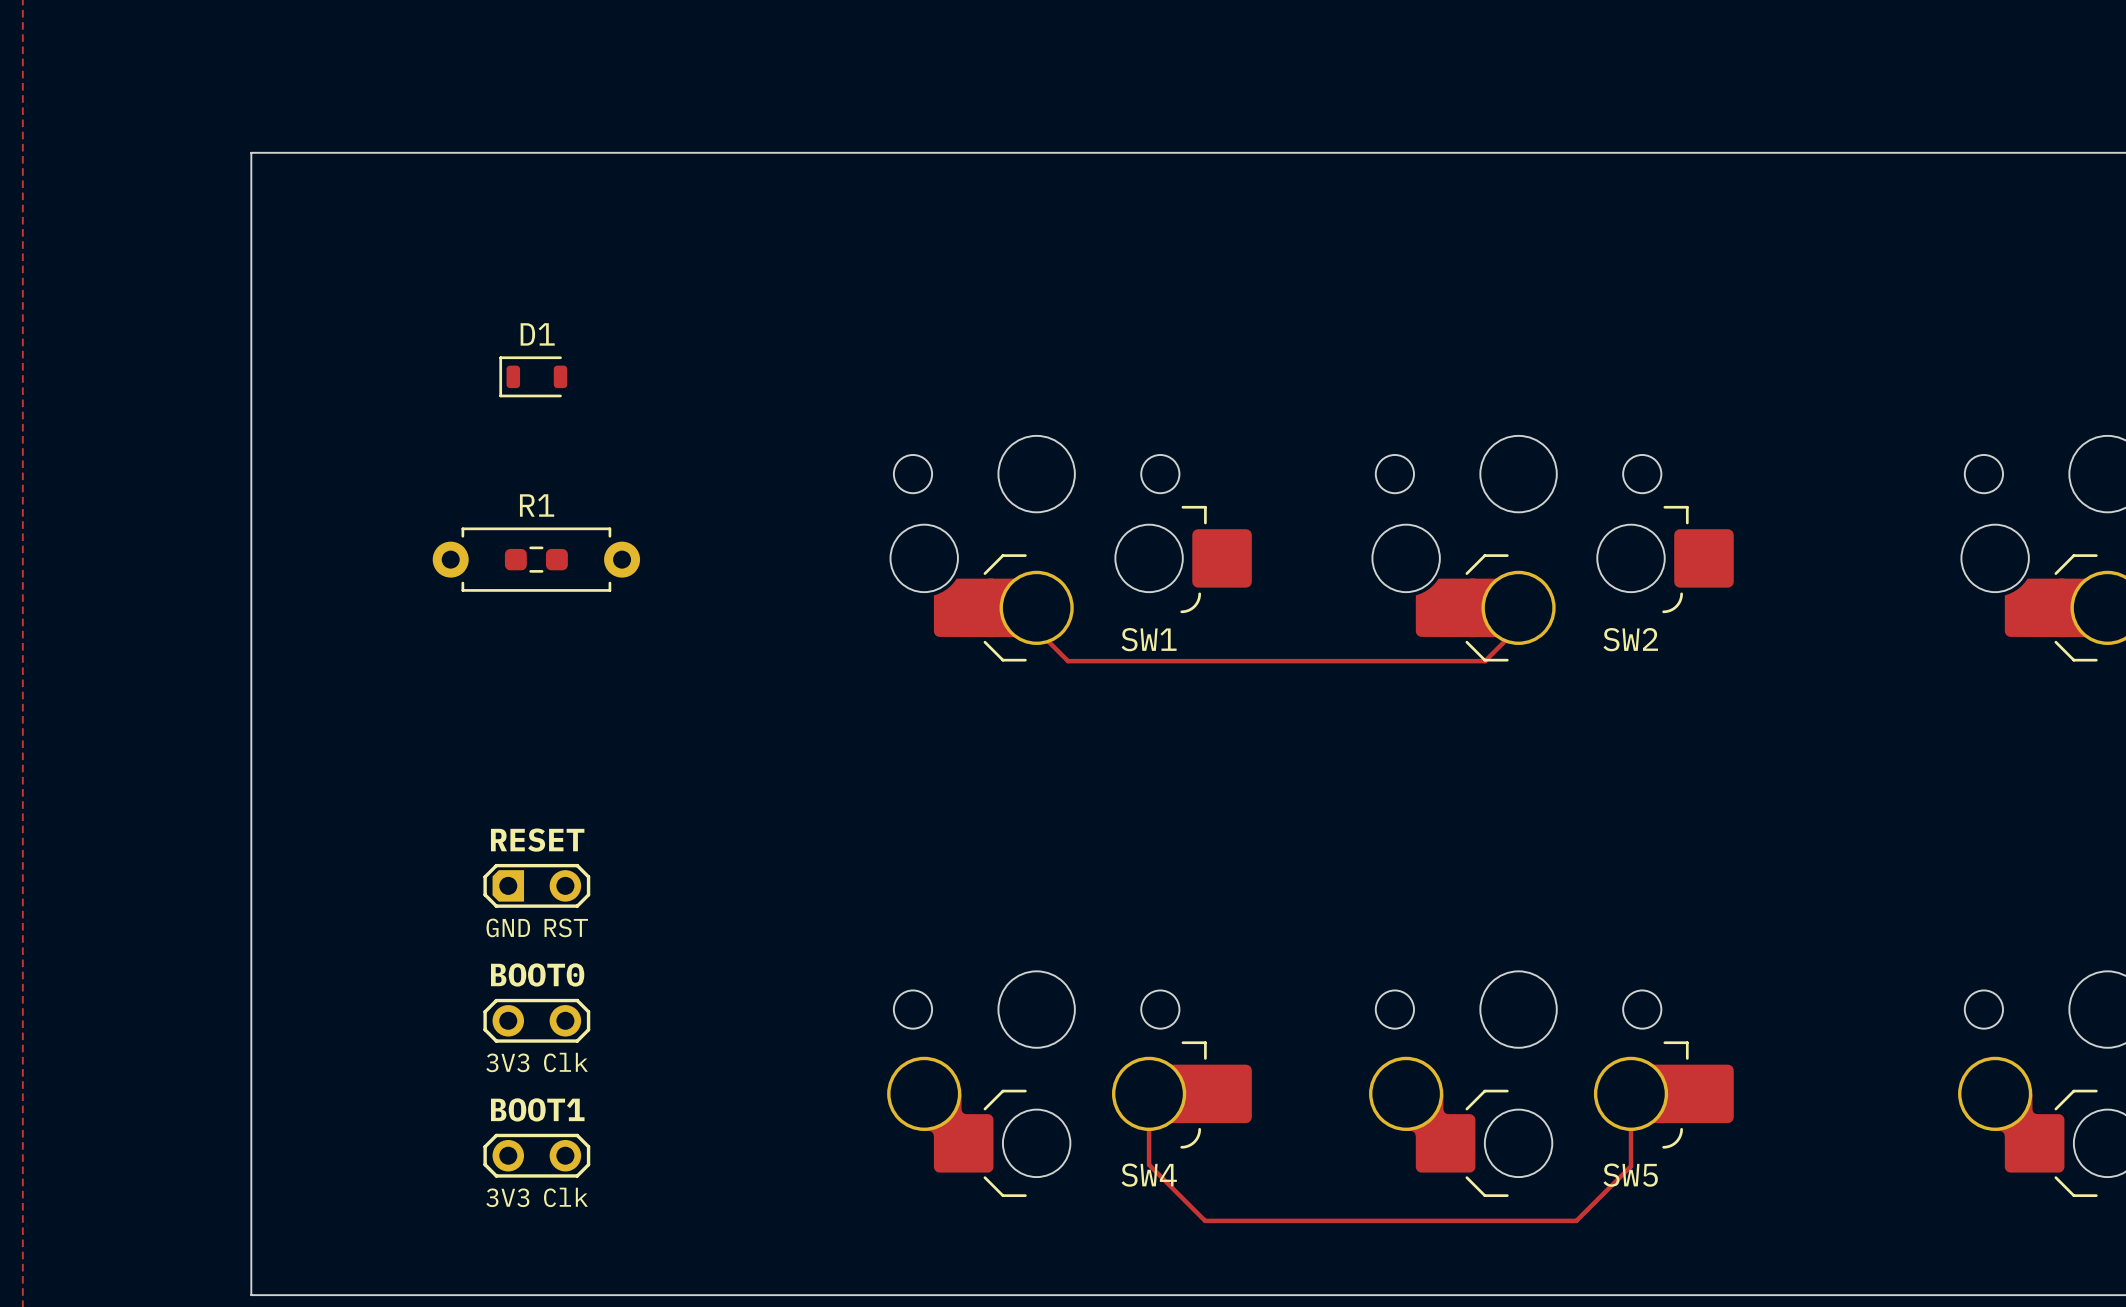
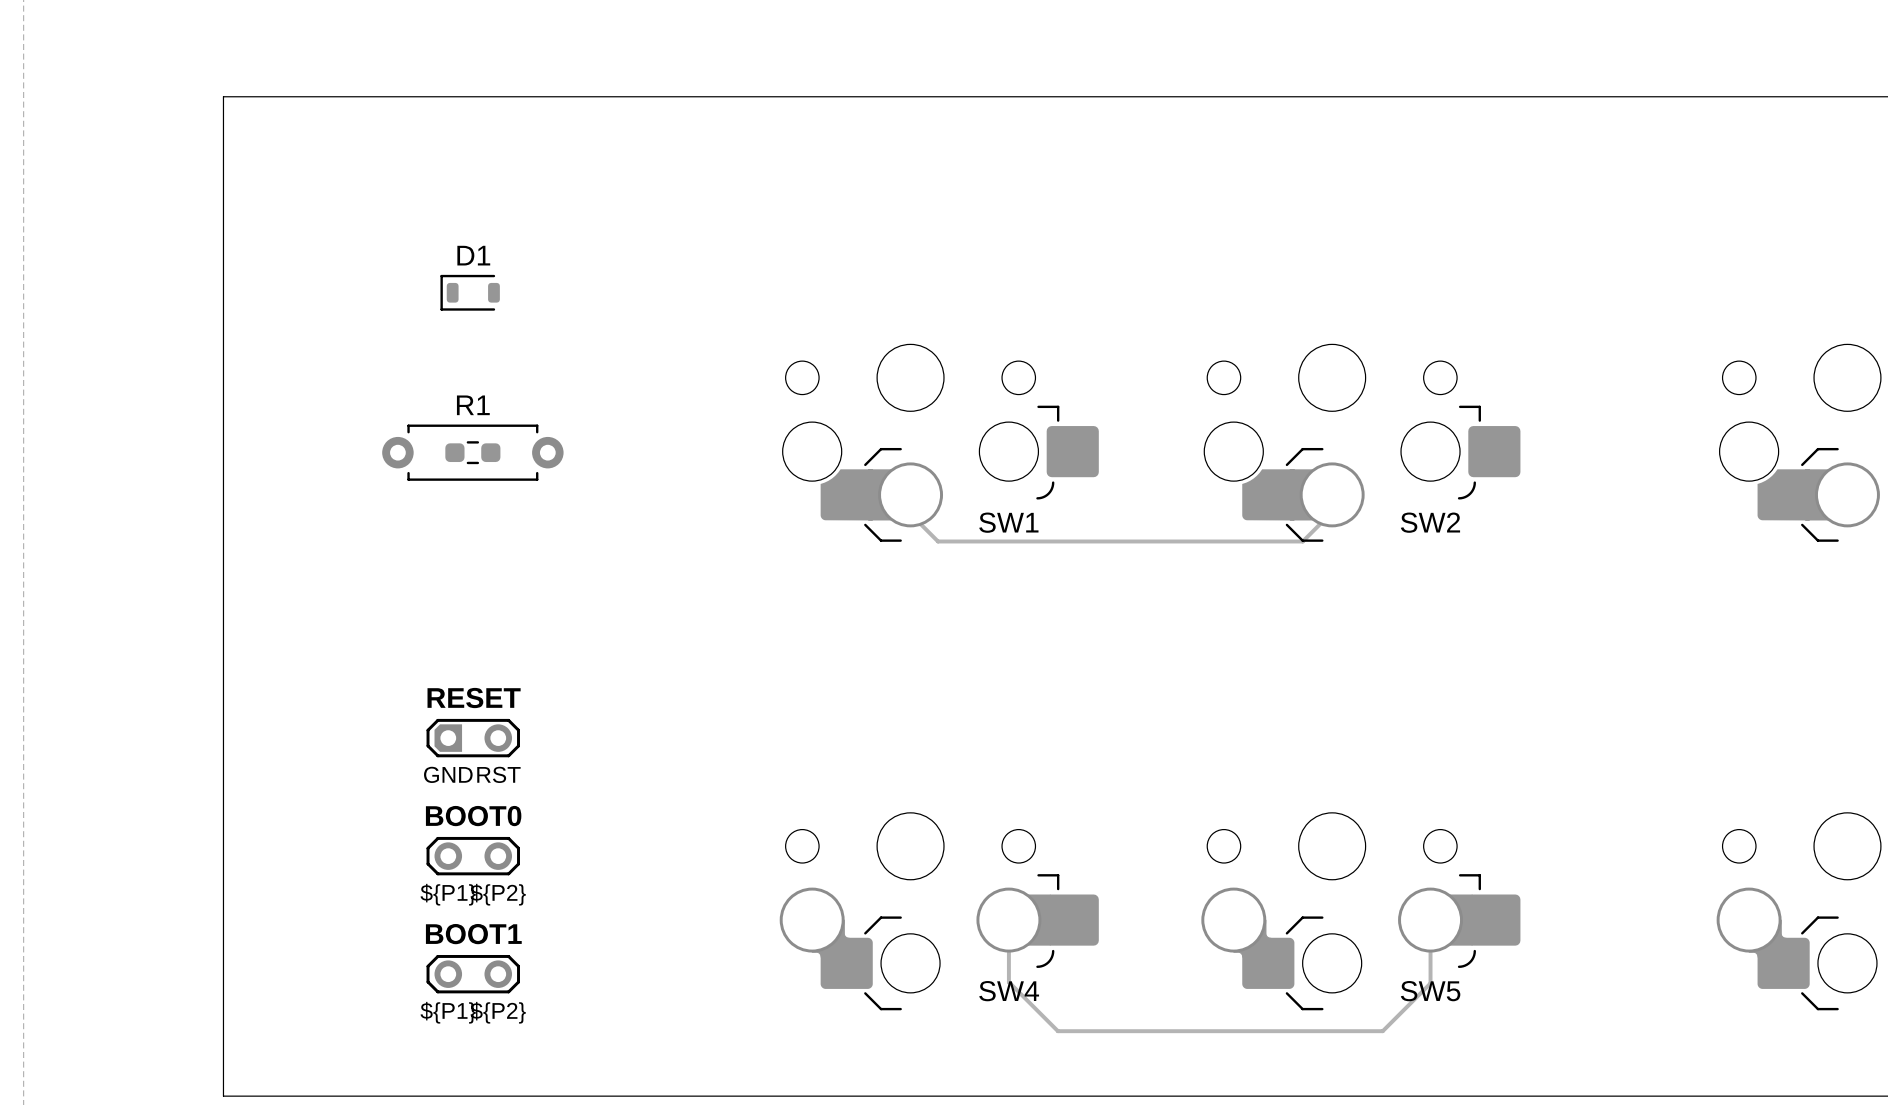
part text: 3V3 (507, 1062) -> ${P1} (448, 894)
part text: Clk (565, 1062) -> ${P2} (498, 894)
part text: 3V3 (507, 1197) -> ${P1} (448, 1012)
part text: Clk (565, 1197) -> ${P2} (498, 1012)

